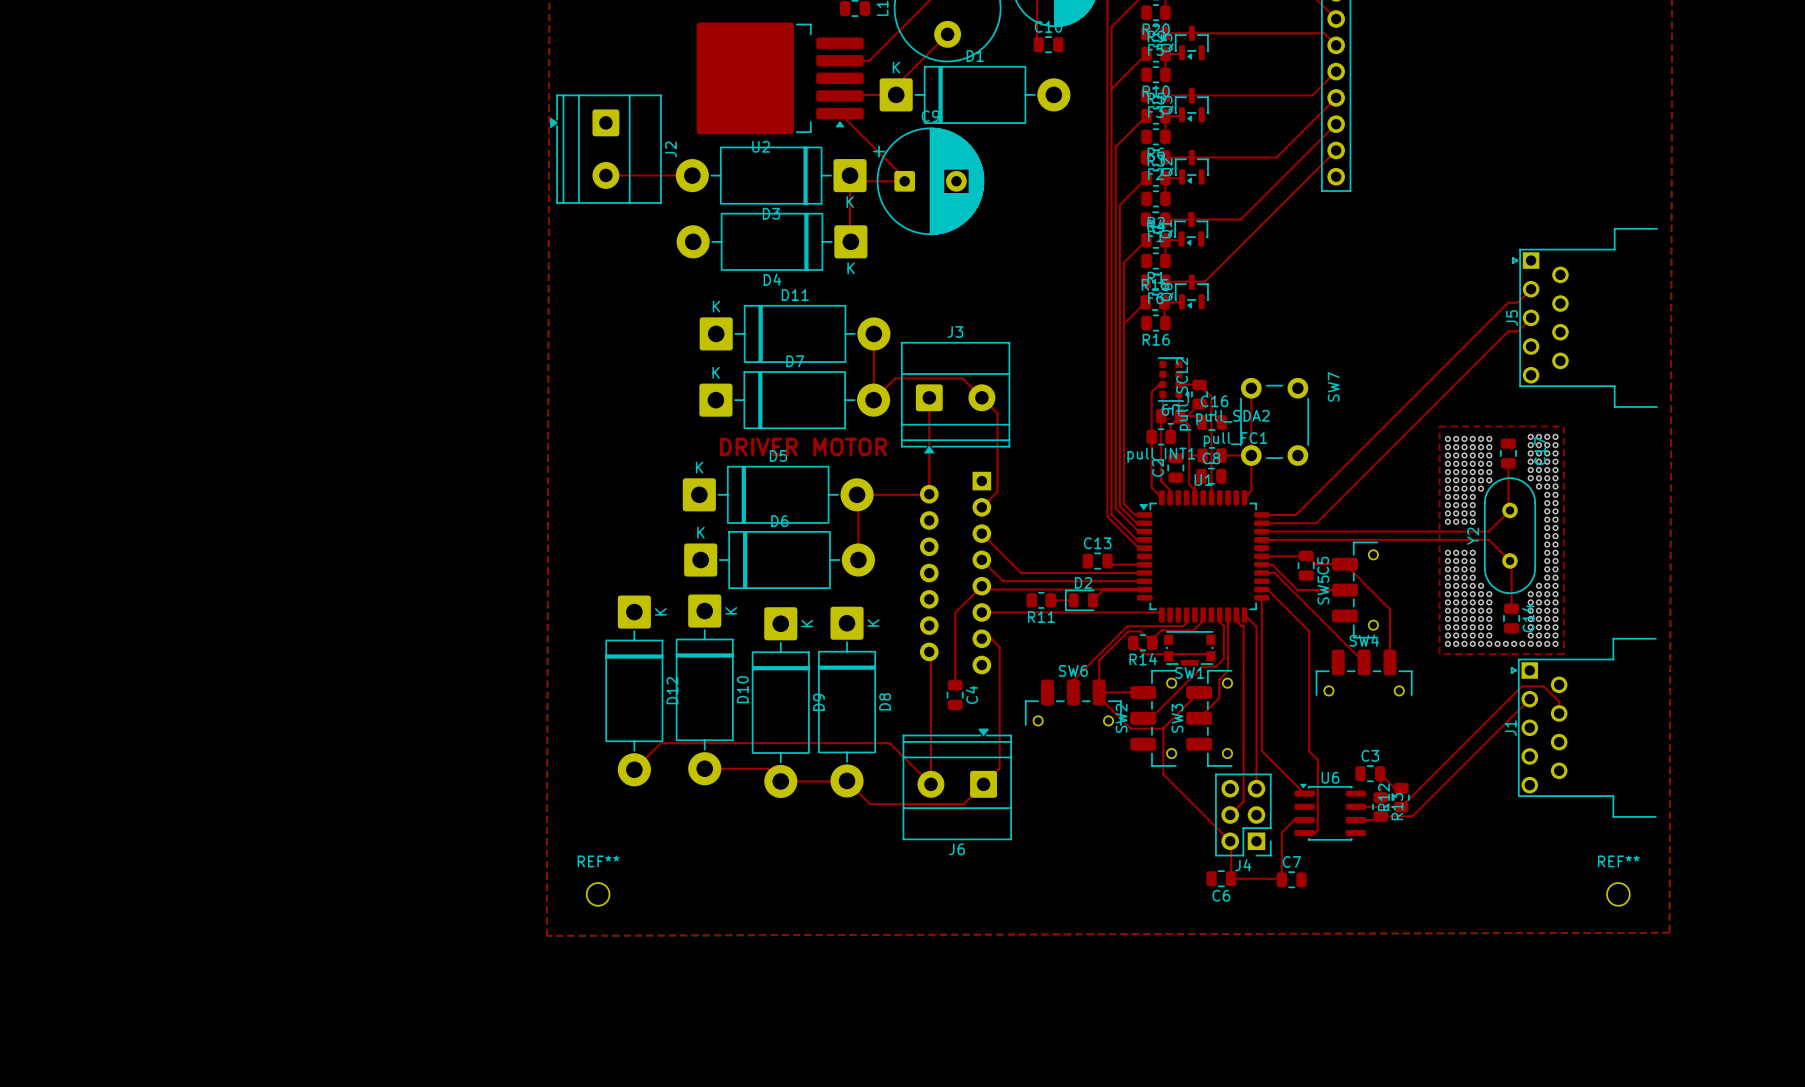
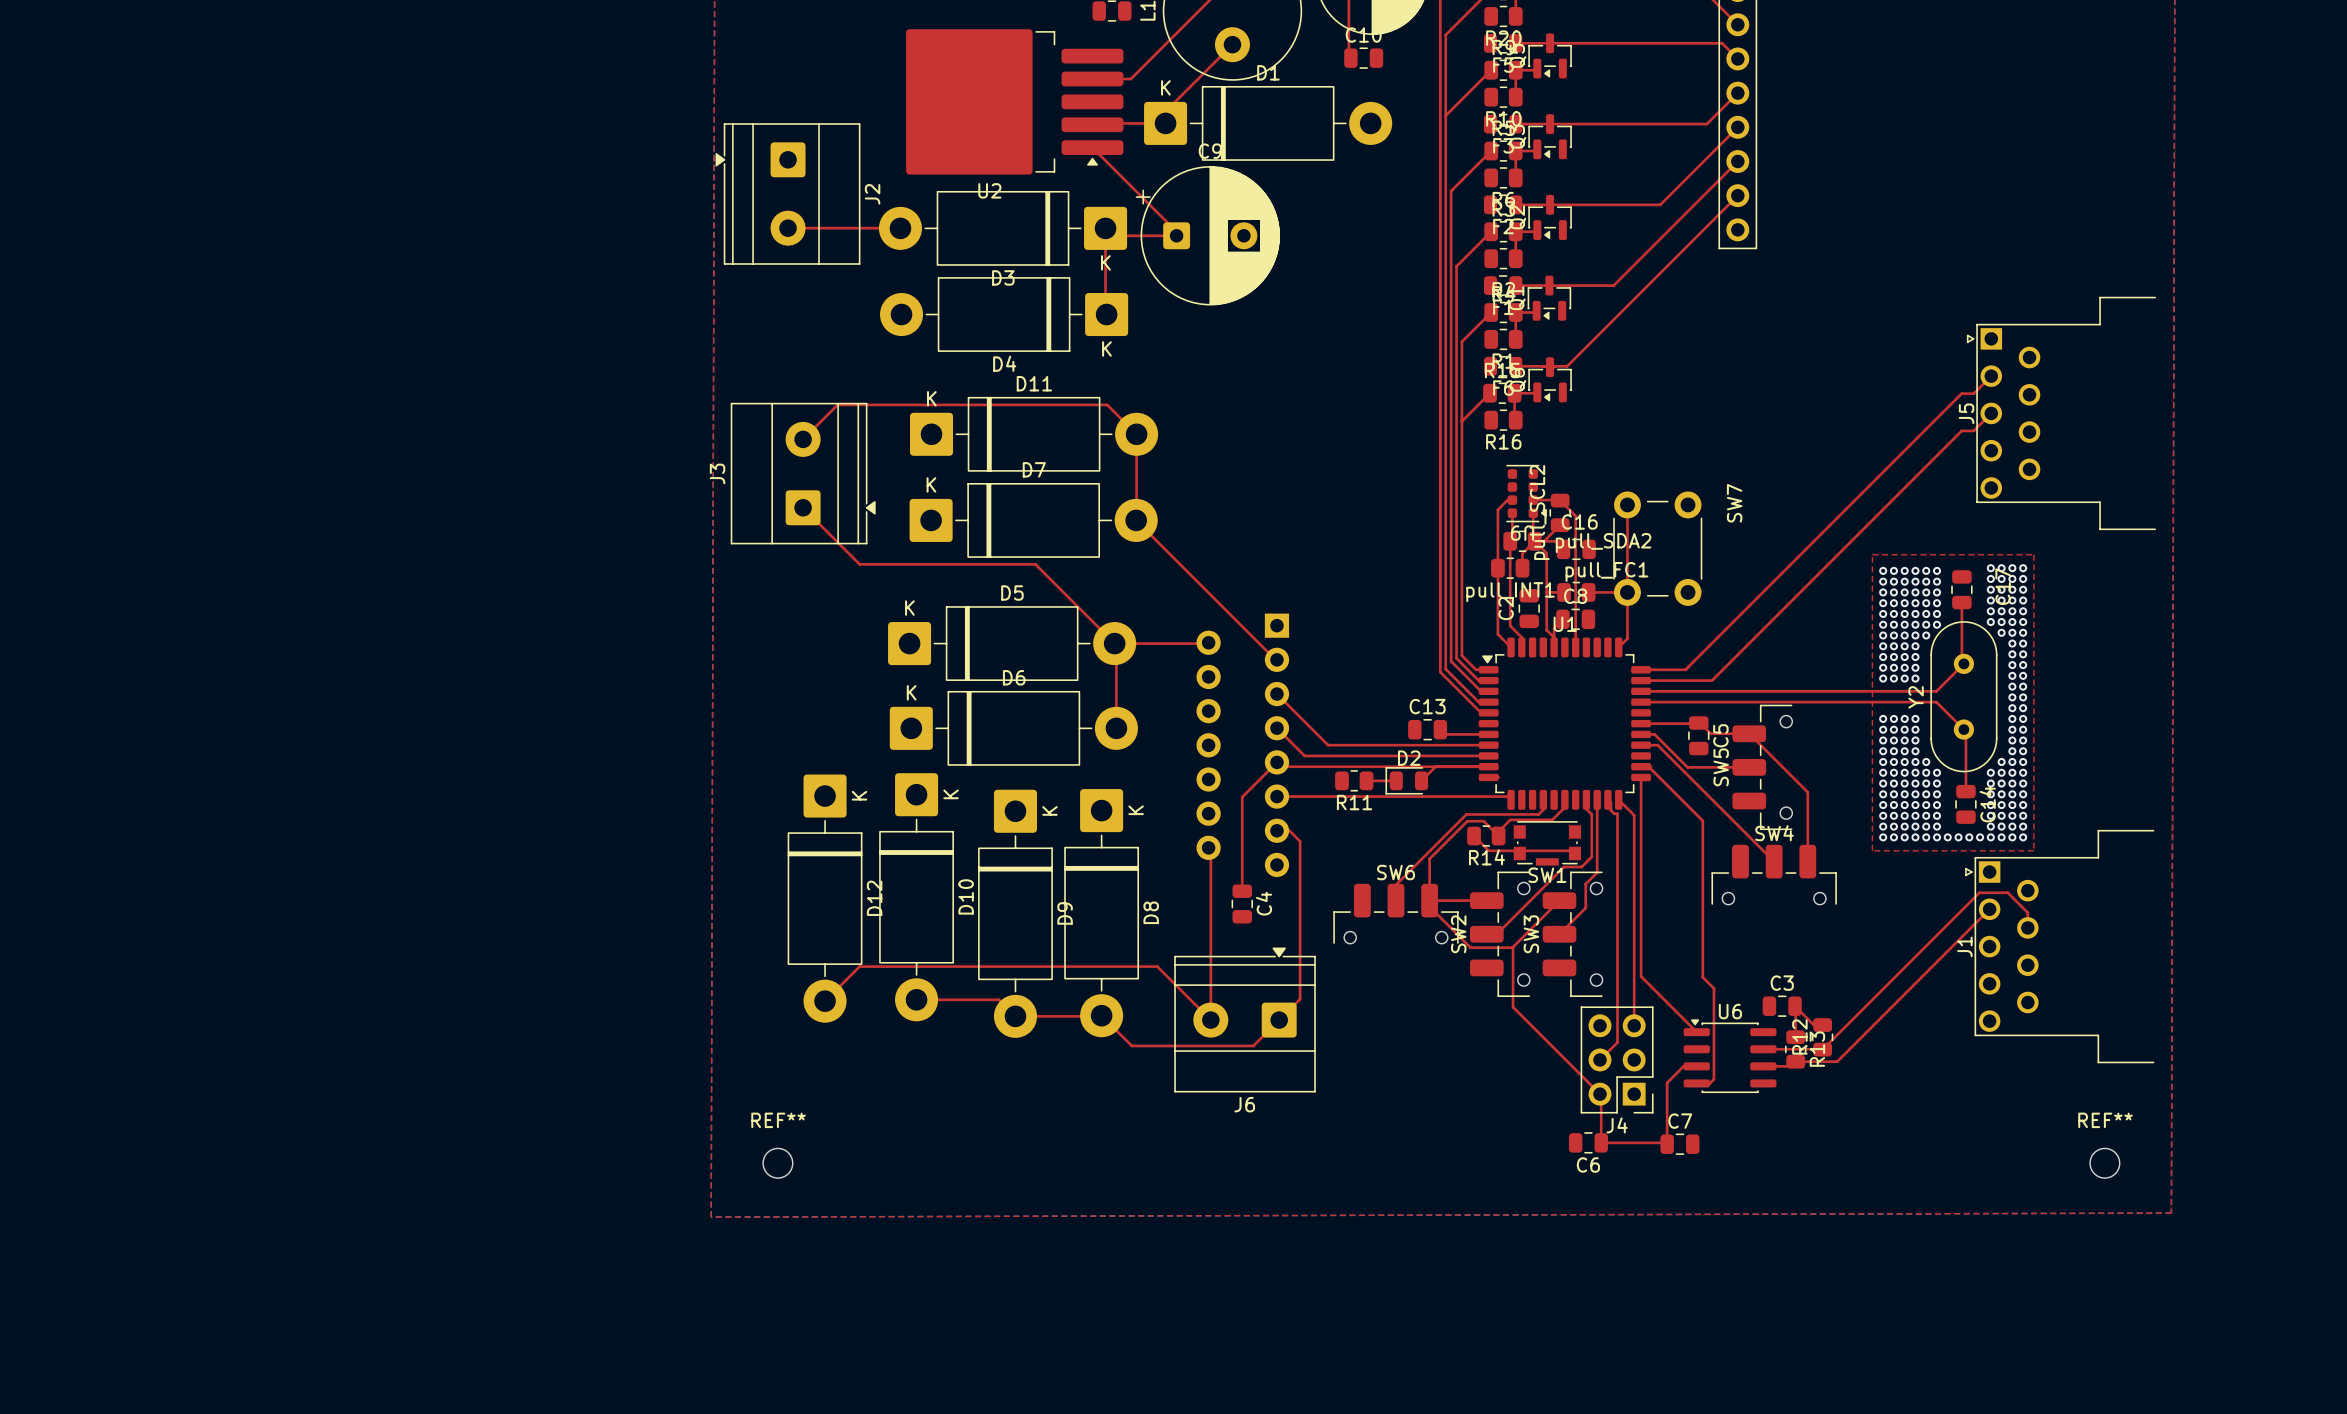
top track: none -> (1136, 434) (1107, 404) (837, 404) (803, 439)
top track: none -> (803, 507) (859, 564) (1035, 564) (1114, 643)
top track: (929, 397) (929, 494) -> none
J3 rotation: 0° (955, 397) -> 90° counterclockwise (803, 473)
J3 position: (955, 397) -> (803, 473)
top track: (873, 399) (895, 378) (962, 378) (997, 413) (997, 491) (981, 507) -> (1136, 520) (1276, 659)
text: DRIVER MOTOR (803, 446) -> none

